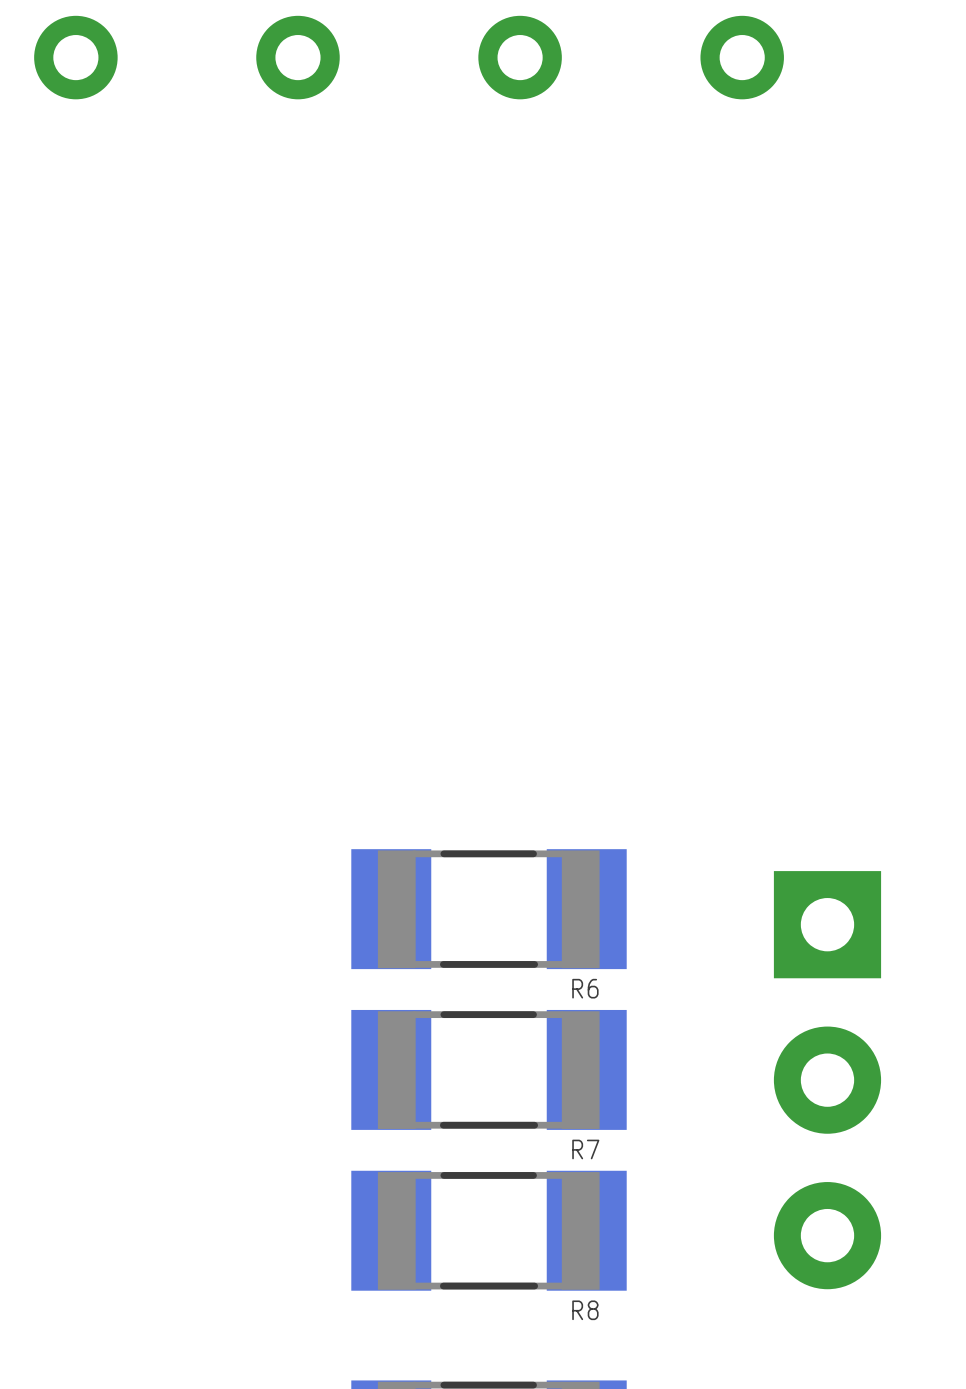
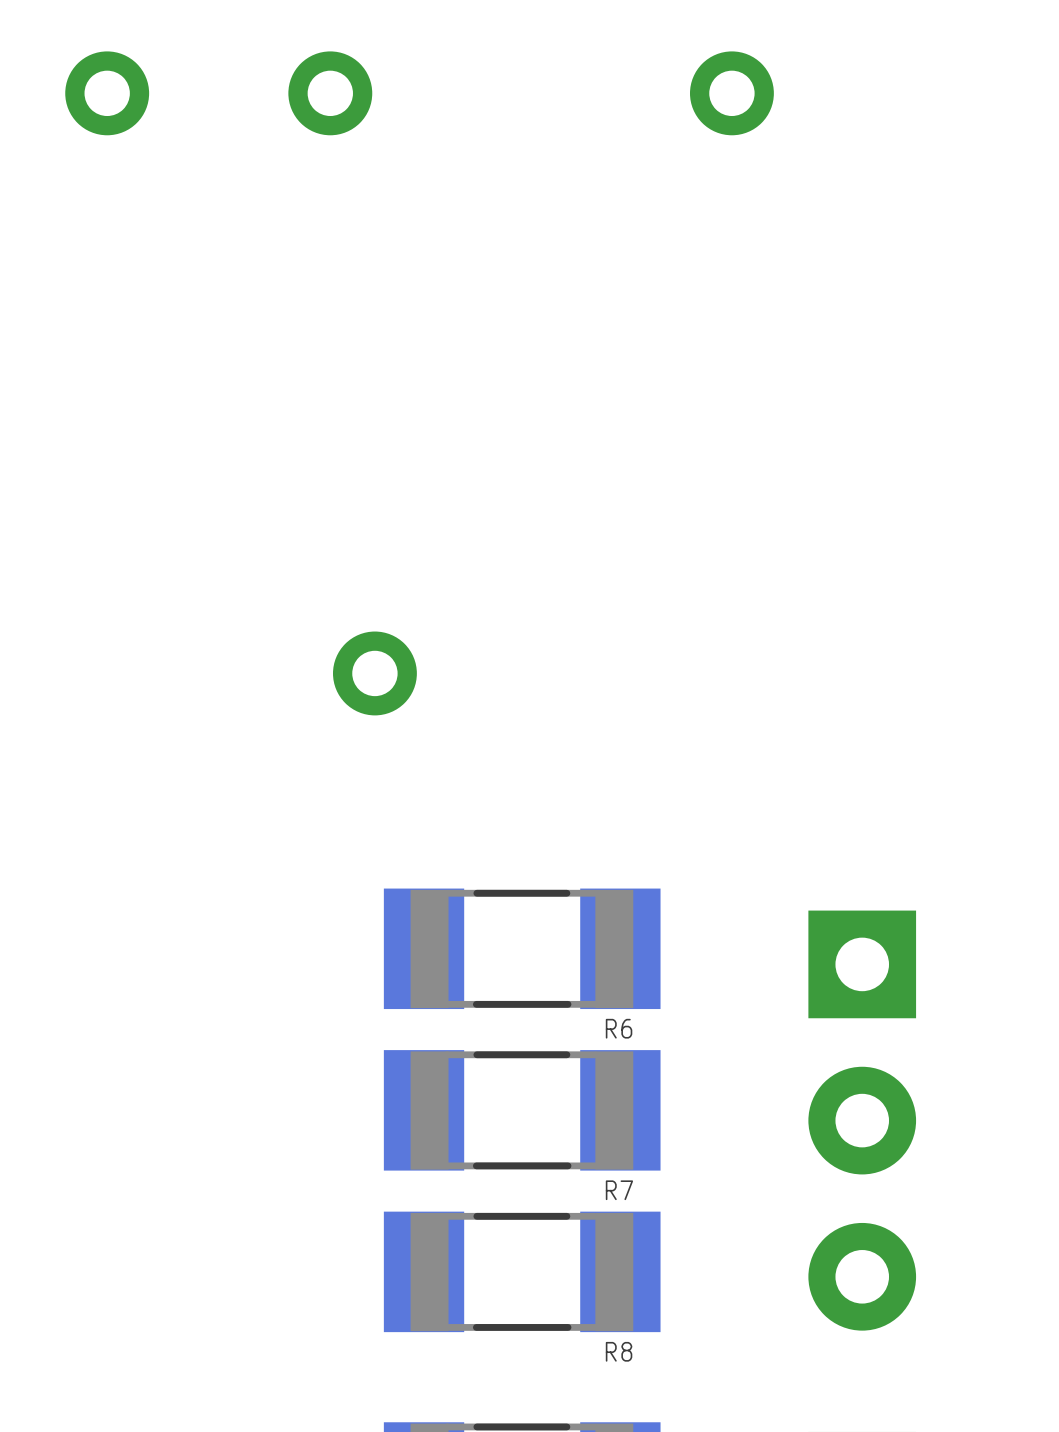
part position: (520, 57) -> (374, 673)
part position: (742, 57) -> (731, 93)

